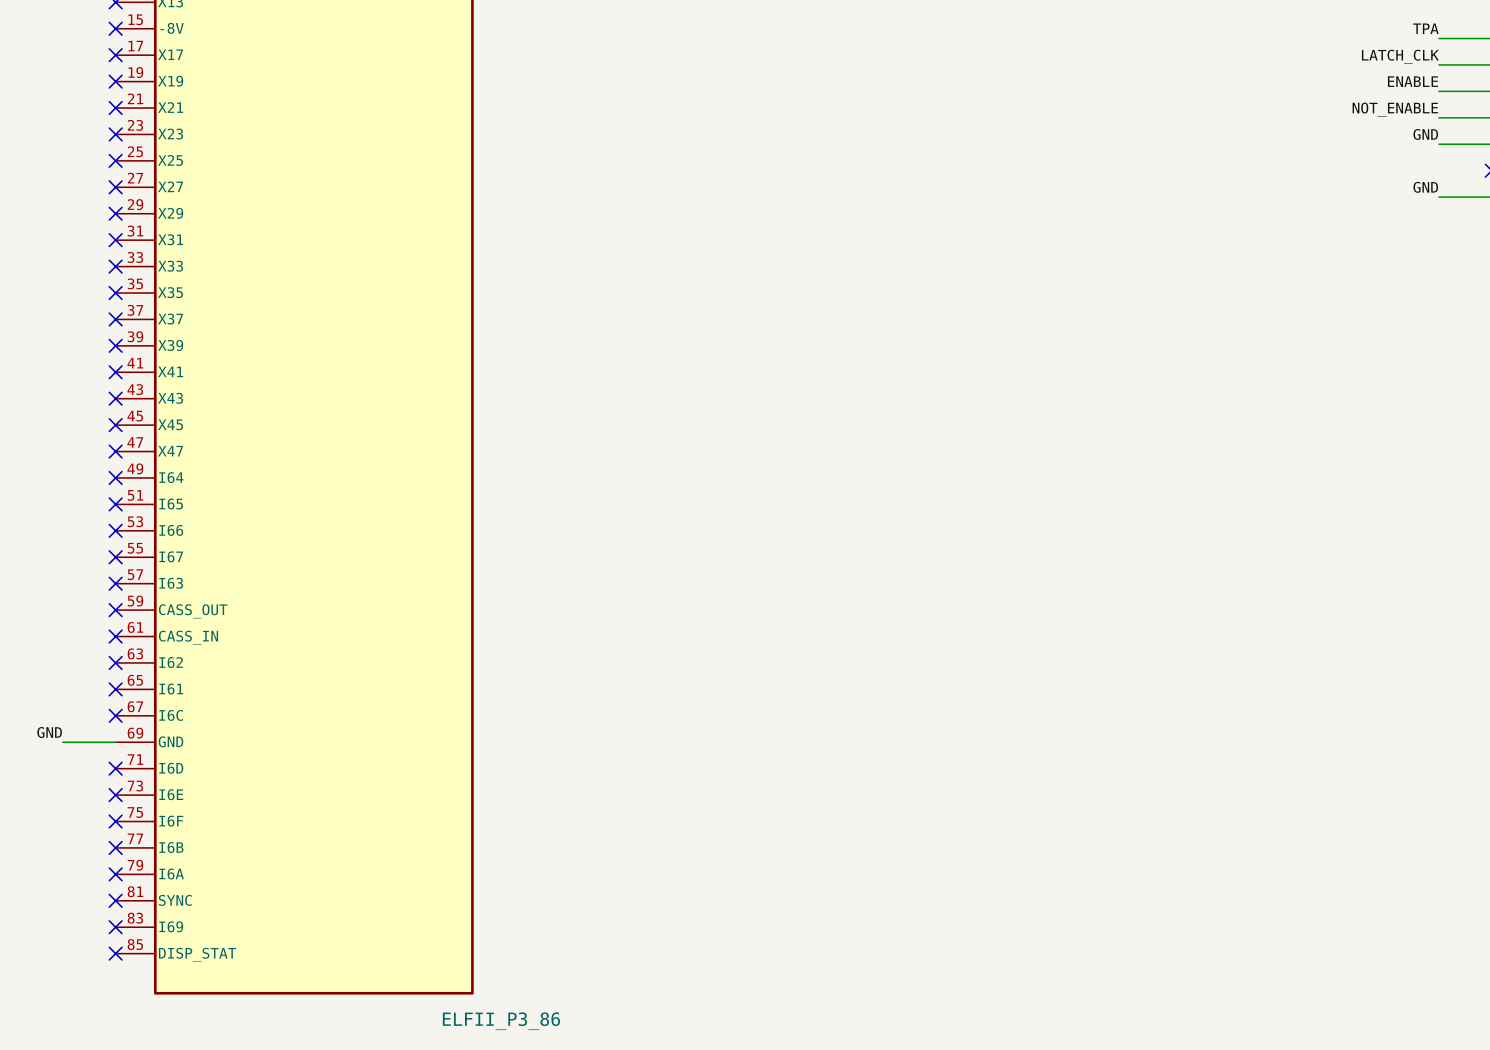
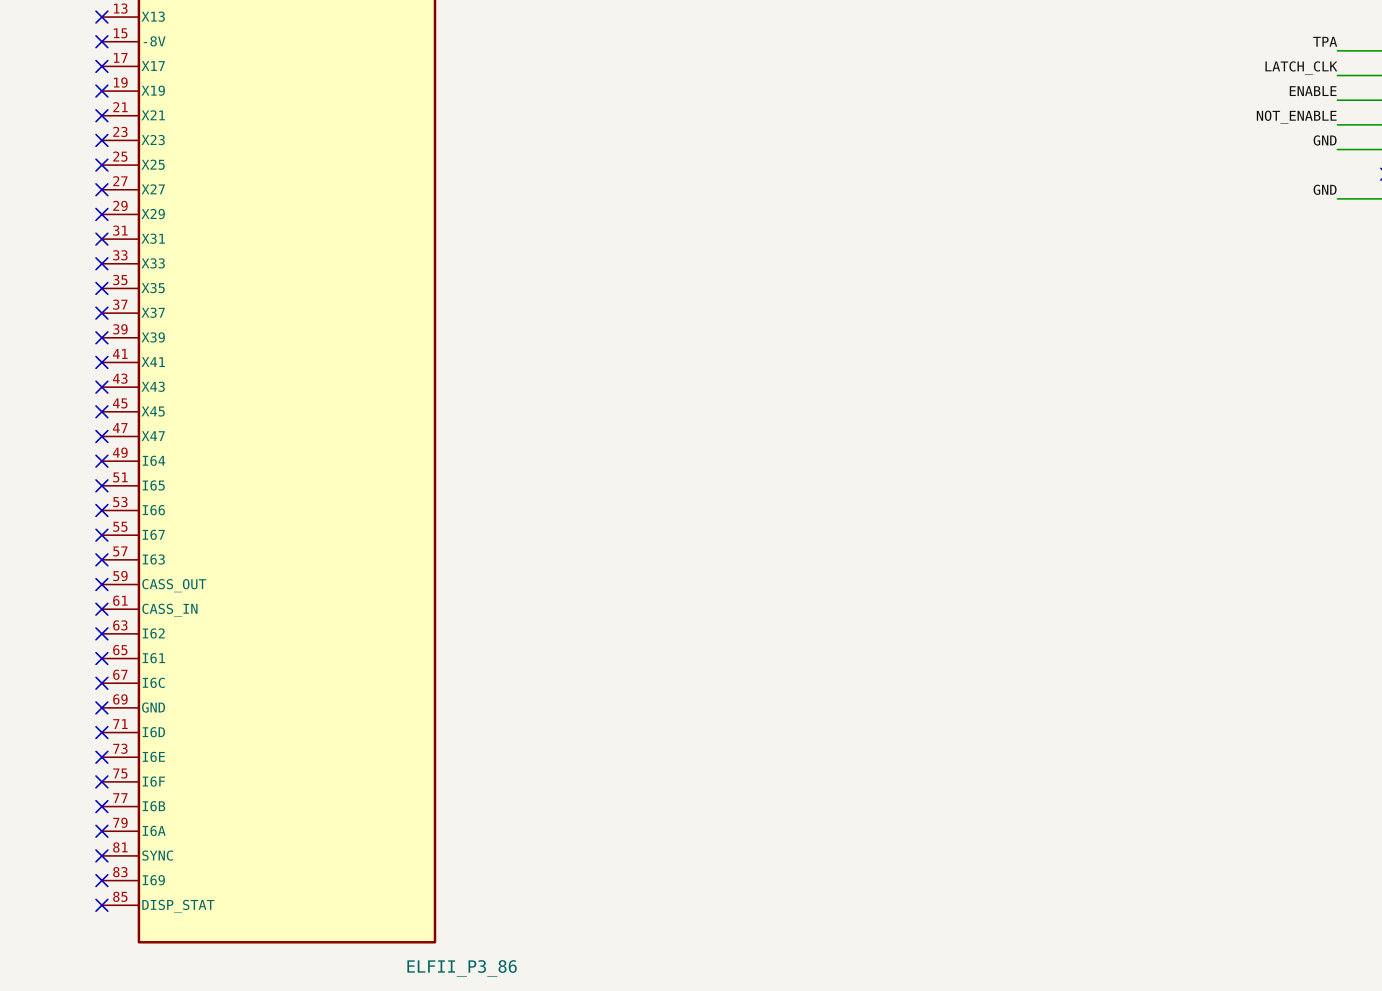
label: GND (49, 732) -> none
wire: (62, 742) (115, 742) -> none
no-connect mark: none -> (101, 707)

